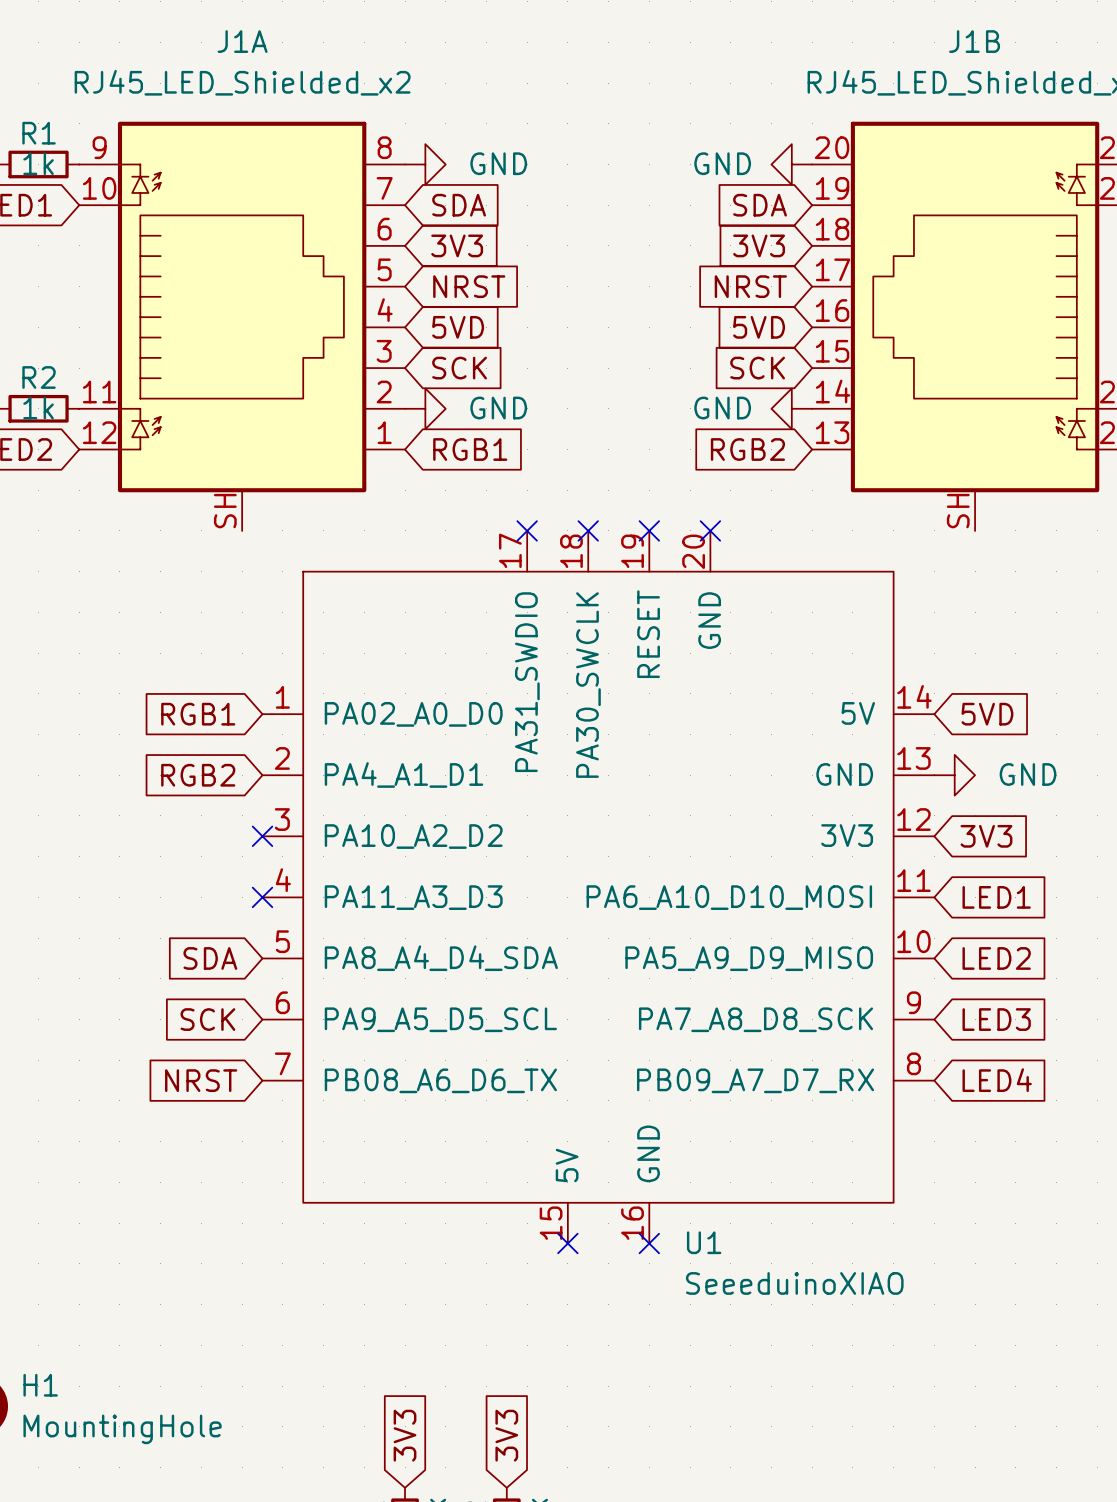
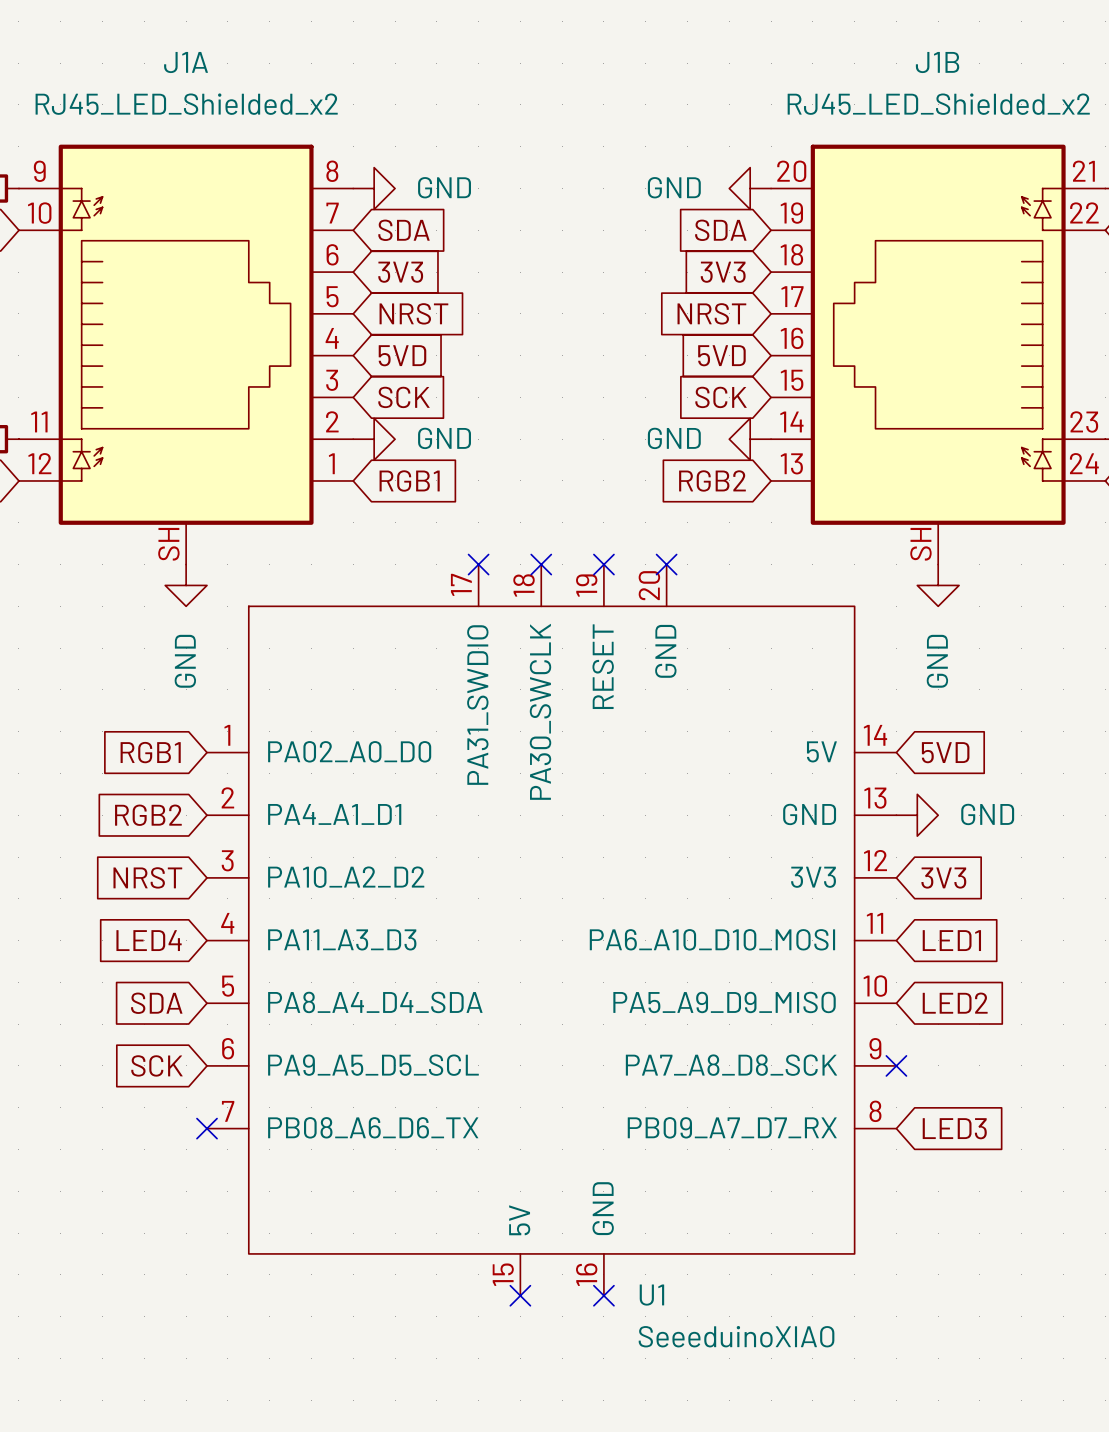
power symbol: none -> GND (186, 585)
power symbol: none -> GND (938, 585)
no-connect mark: (262, 836) -> none
global label: none -> LED4 (149, 940)
no-connect mark: (262, 897) -> none
no-connect mark: none -> (896, 1065)
global label: LED3 (996, 1019) -> none
global label position: NRST (201, 1080) -> NRST (147, 877)
no-connect mark: none -> (207, 1128)
global label: LED4 (997, 1080) -> LED3 (954, 1128)

